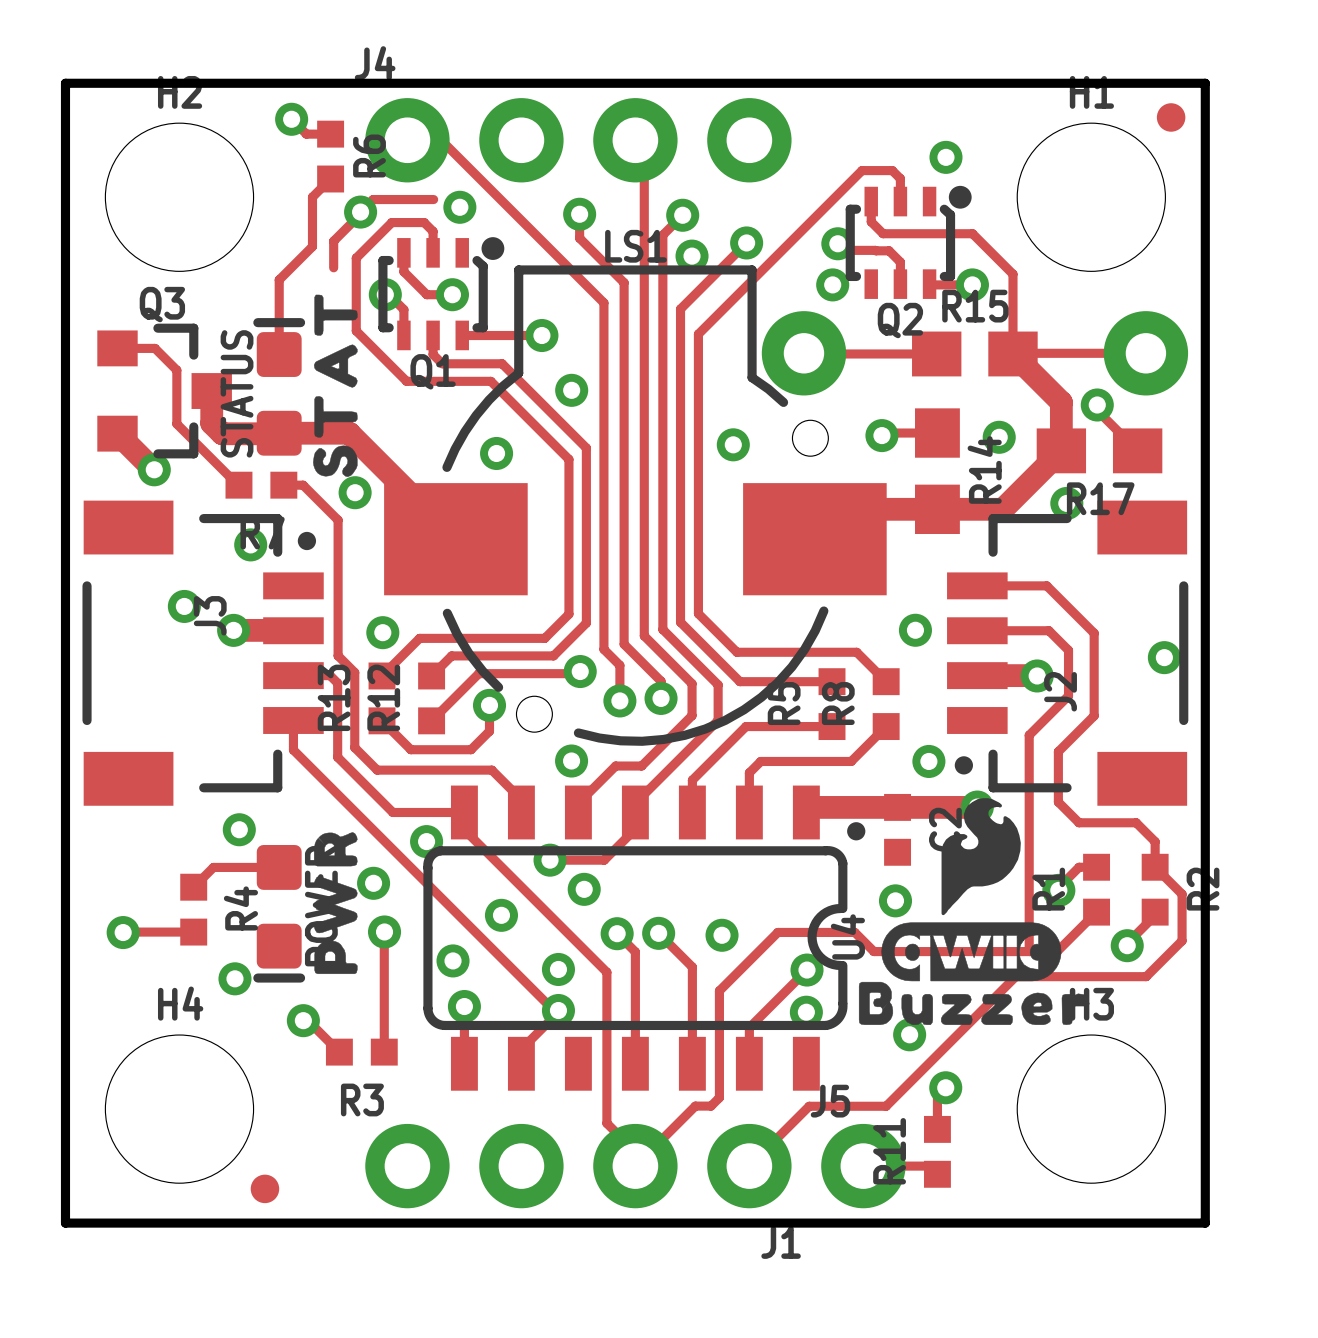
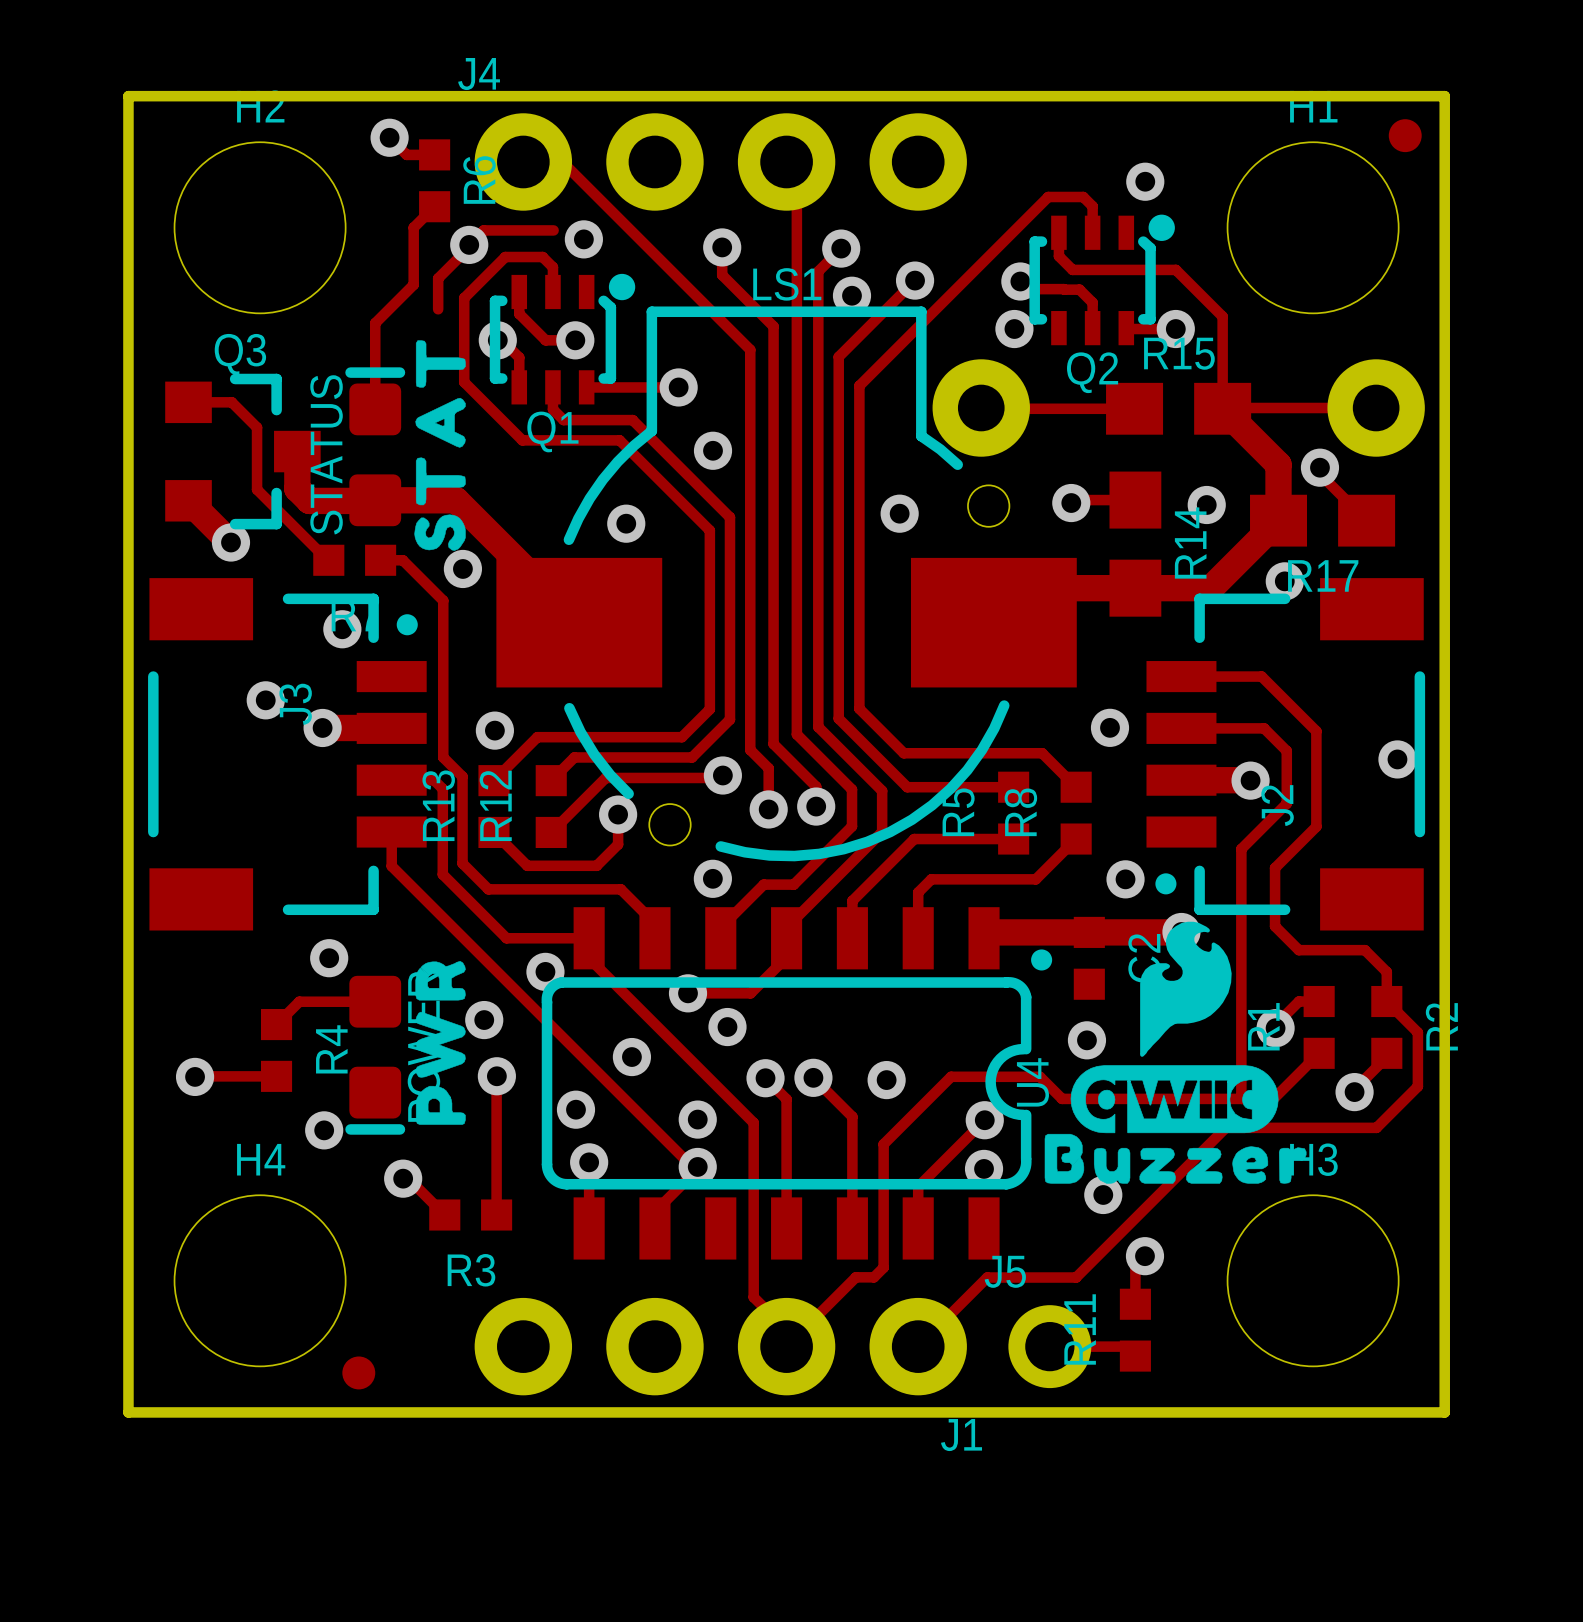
J5 footprint: [821, 1123, 906, 1209] -> [1008, 1305, 1092, 1389]

